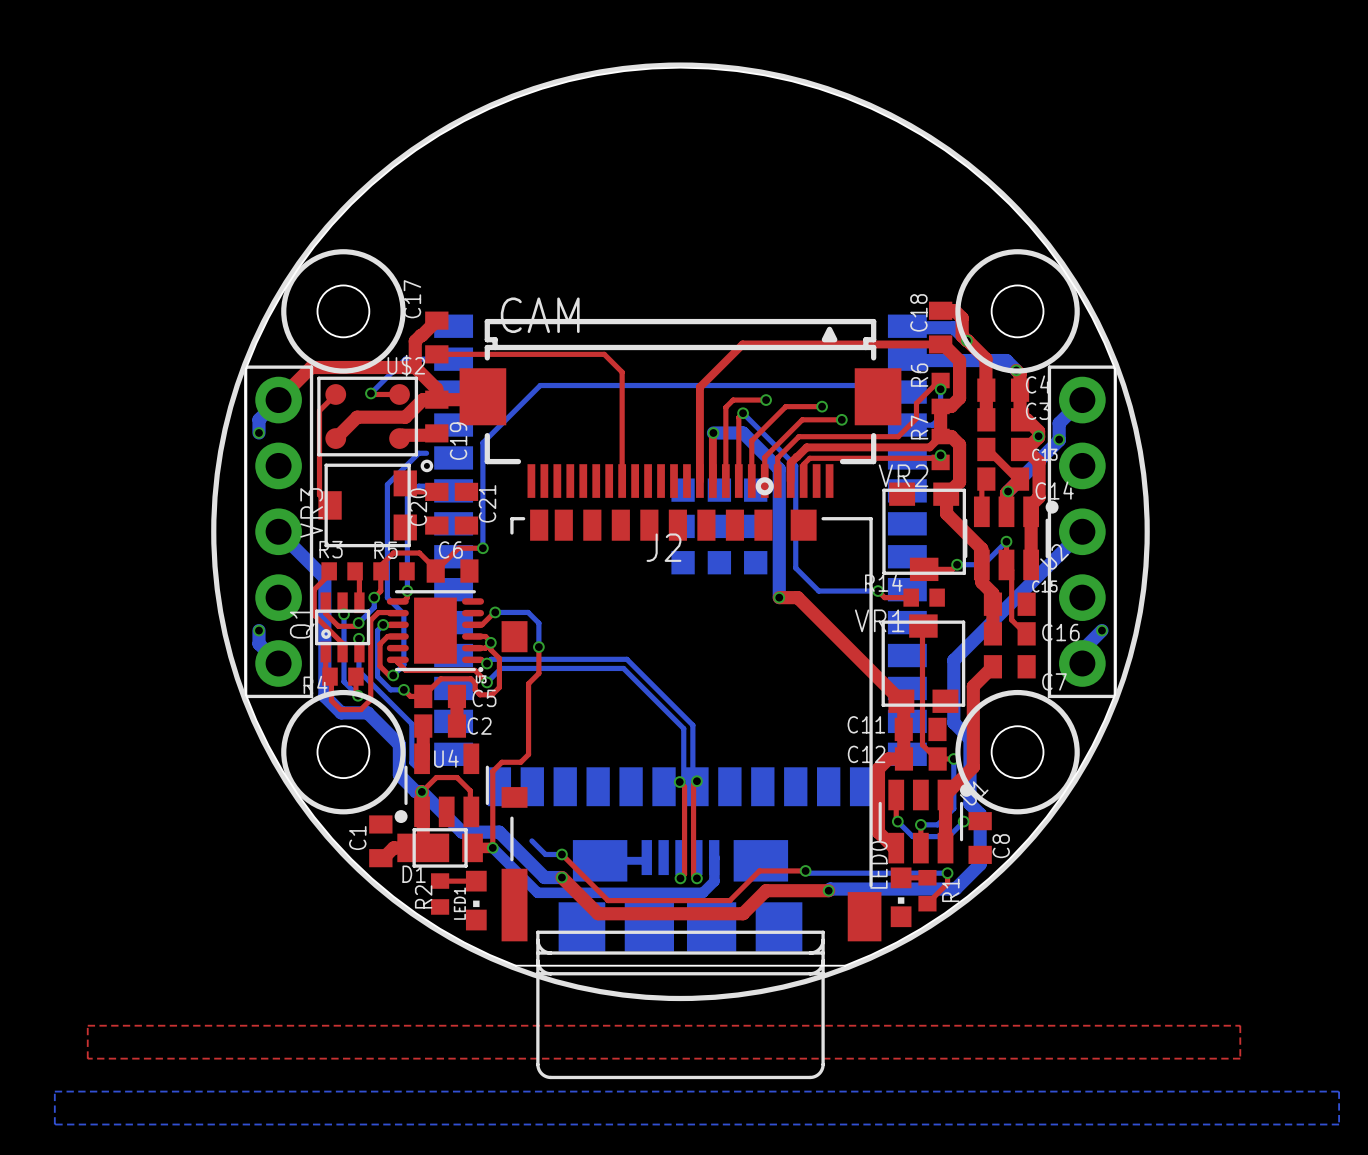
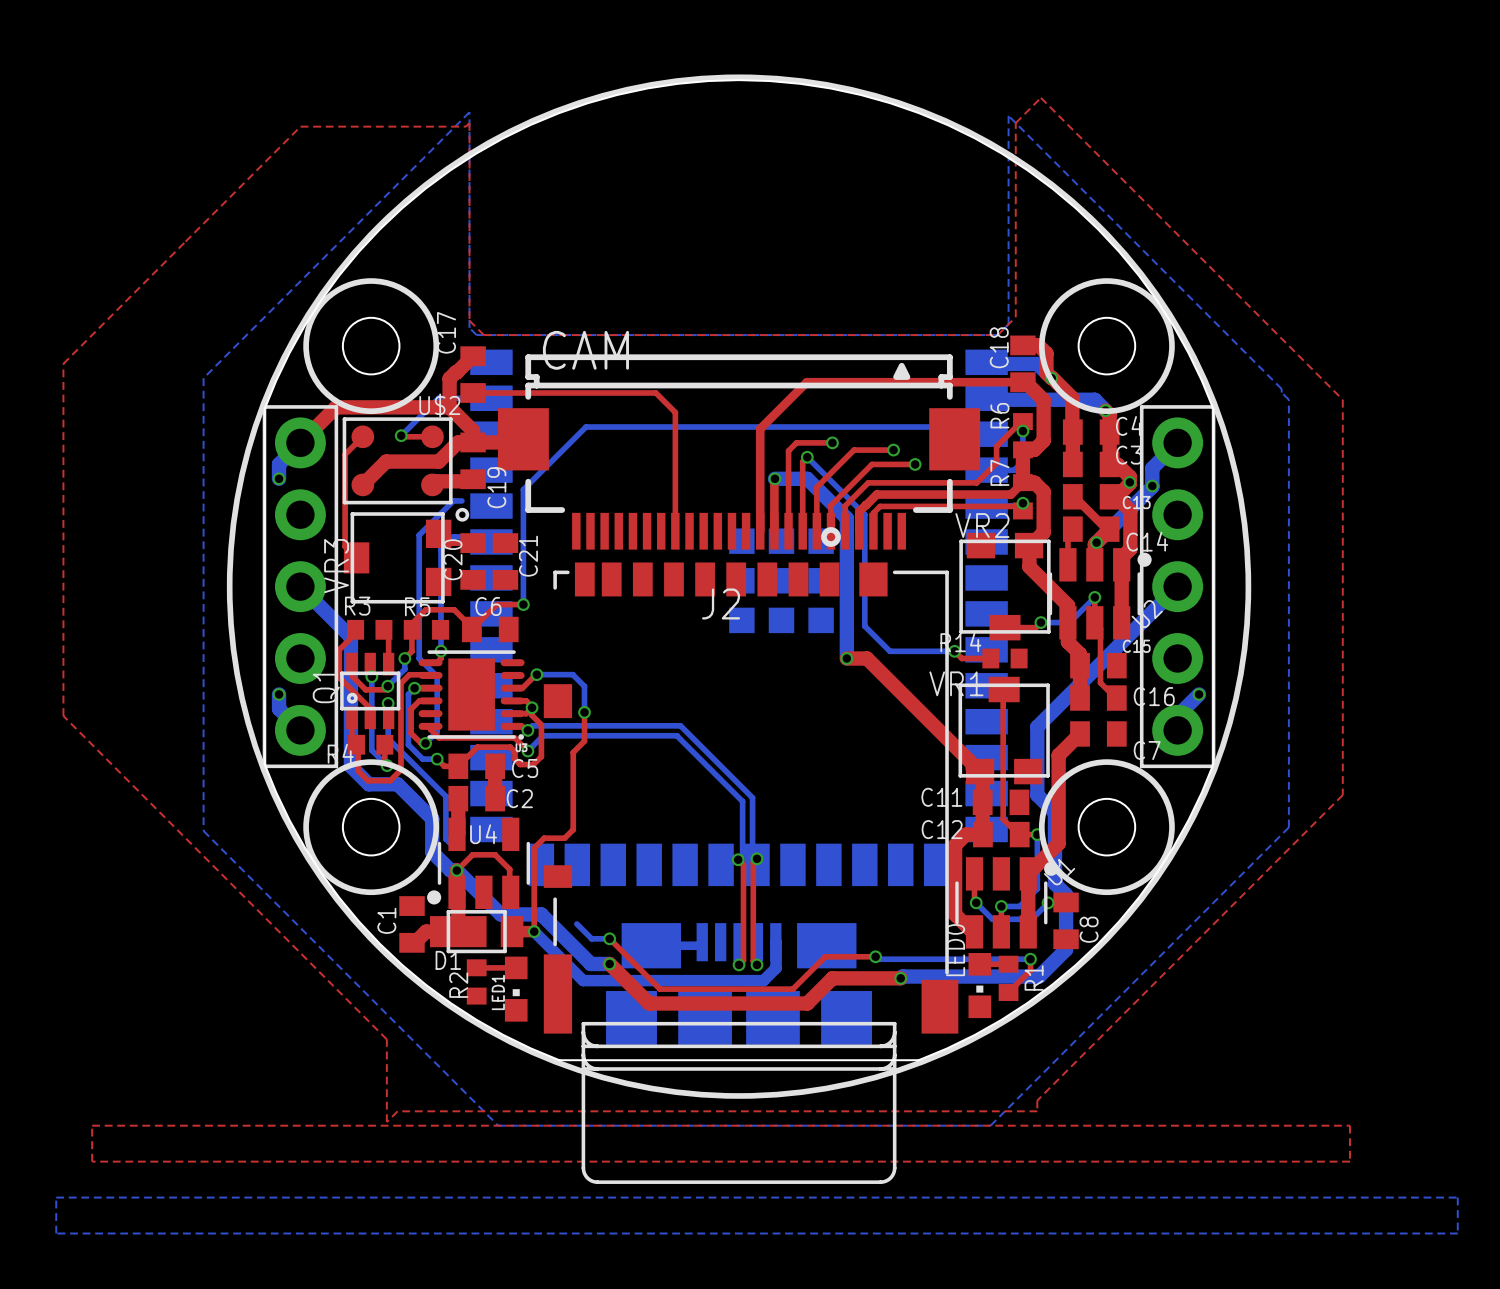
top zone outline: none -> (1040, 97) (1015, 123) (1015, 317) (997, 335) (483, 335) (469, 320) (469, 123) (465, 126) (300, 126) (63, 363) (63, 716) (386, 1039) (386, 1122) (397, 1111) (1037, 1111) (1037, 1100) (1342, 795) (1342, 399) (1040, 97)
bottom zone outline: none -> (469, 112) (469, 327) (476, 335) (997, 335) (1008, 324) (1008, 115) (1281, 388) (1281, 392) (1288, 399) (1288, 827) (990, 1125) (498, 1125) (203, 831) (203, 378) (469, 112)

